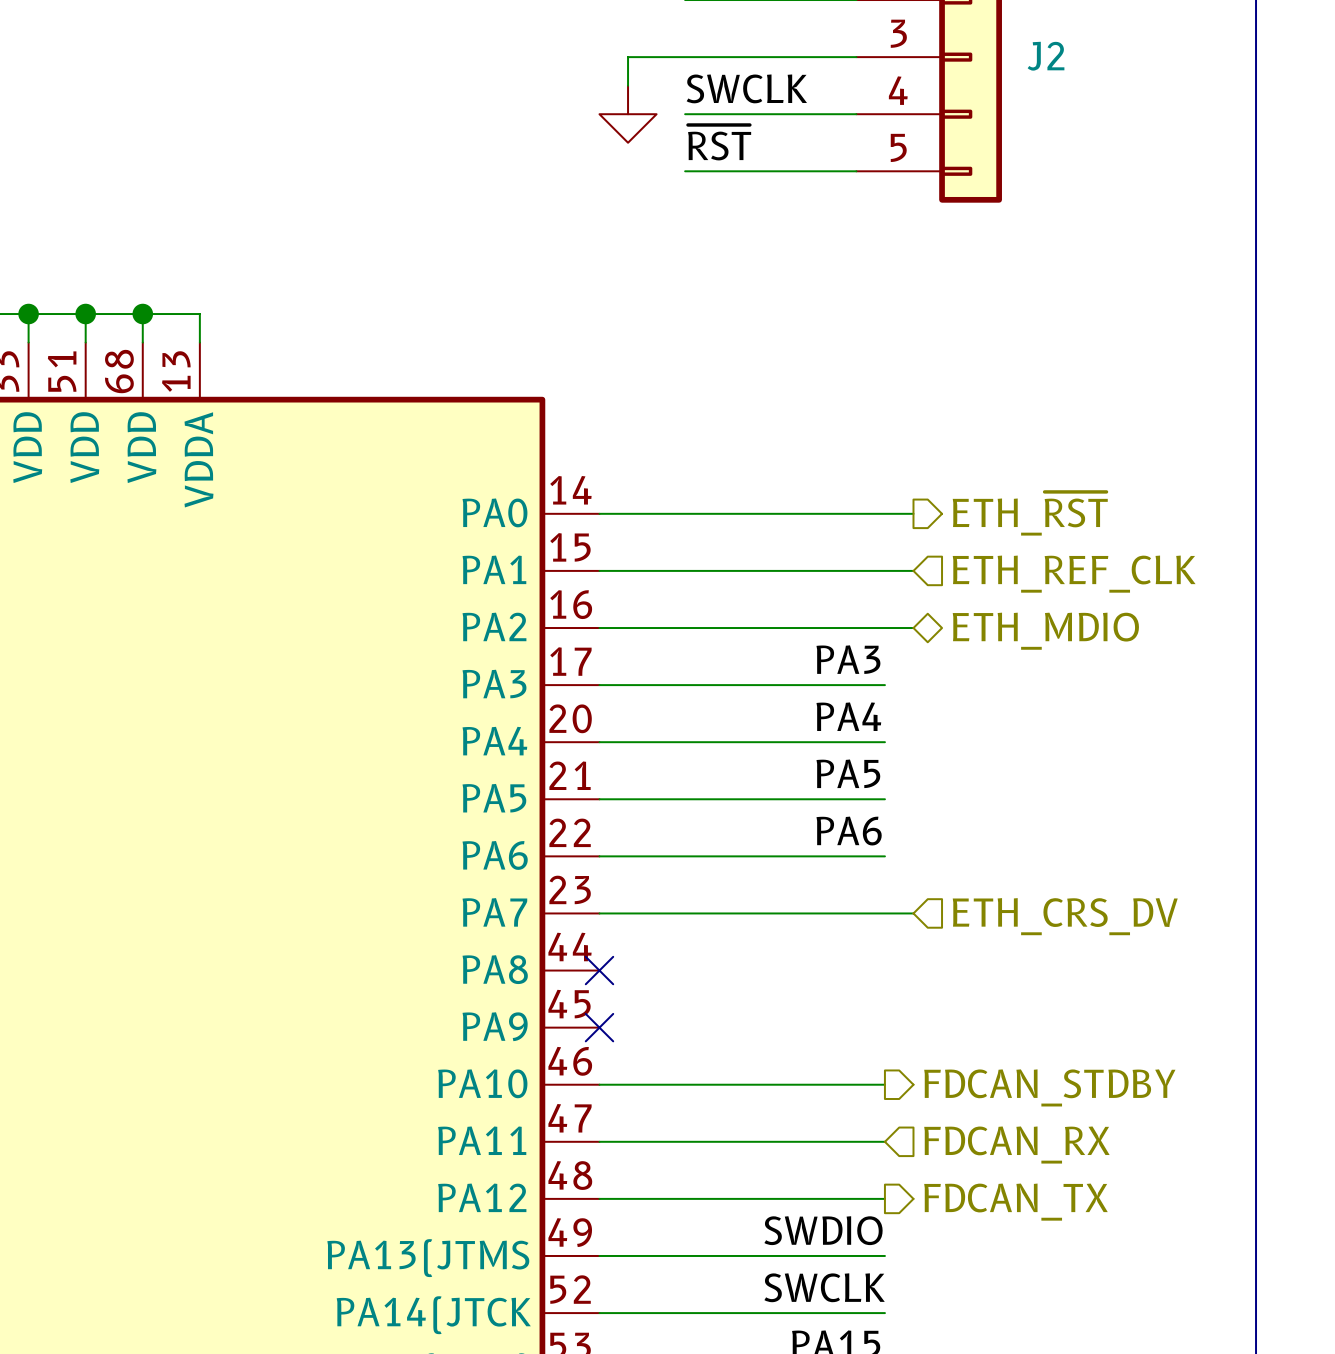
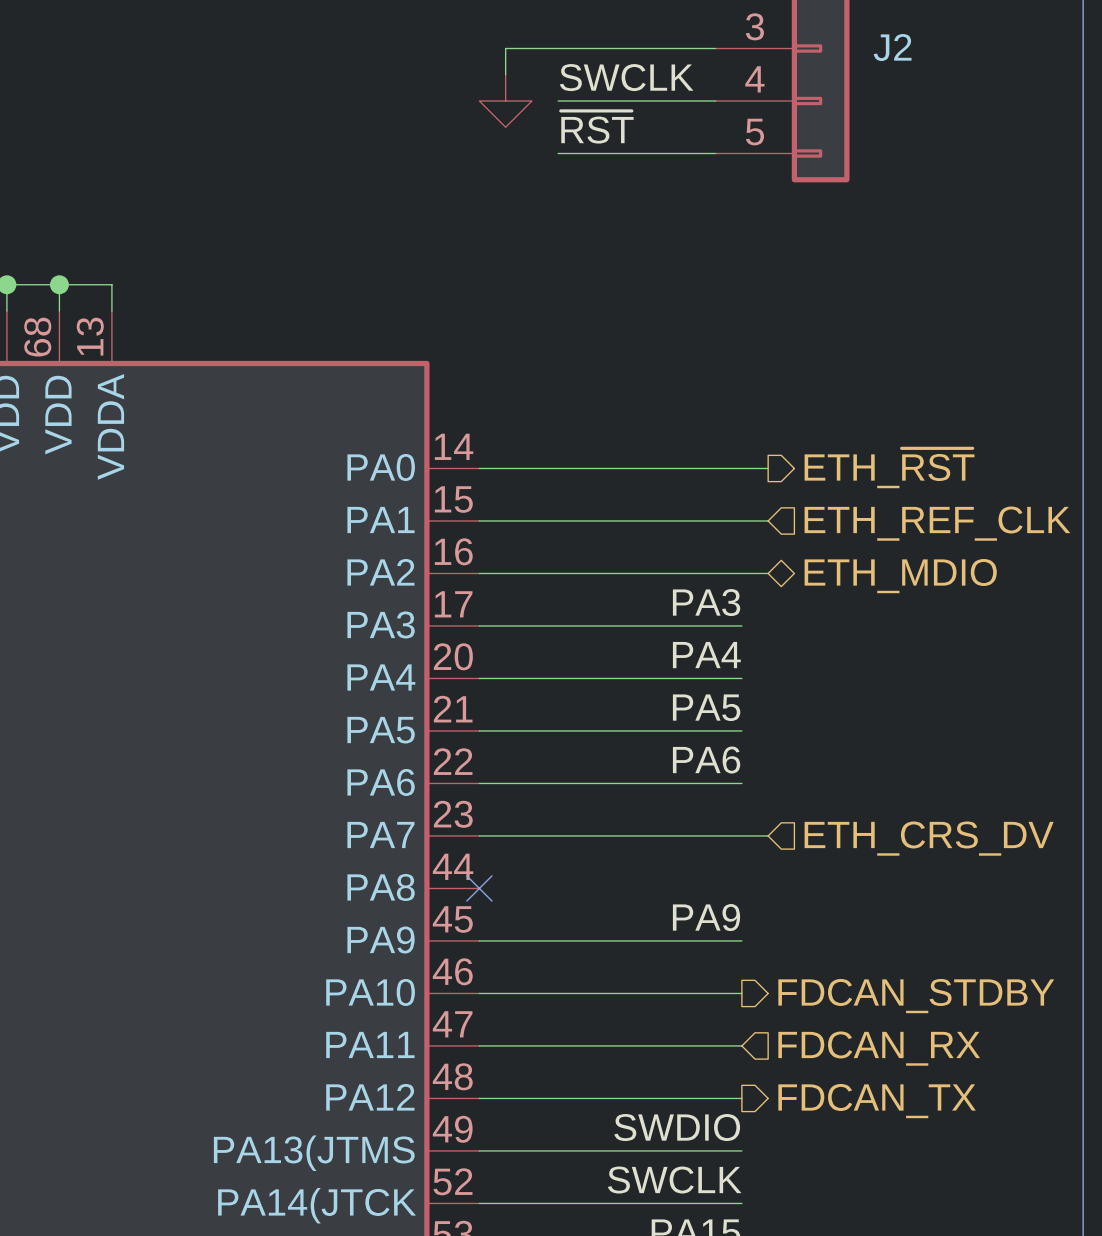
label: none -> PA9 (706, 917)
wire: none -> (479, 940) (741, 940)
no-connect mark: (599, 1027) -> none

